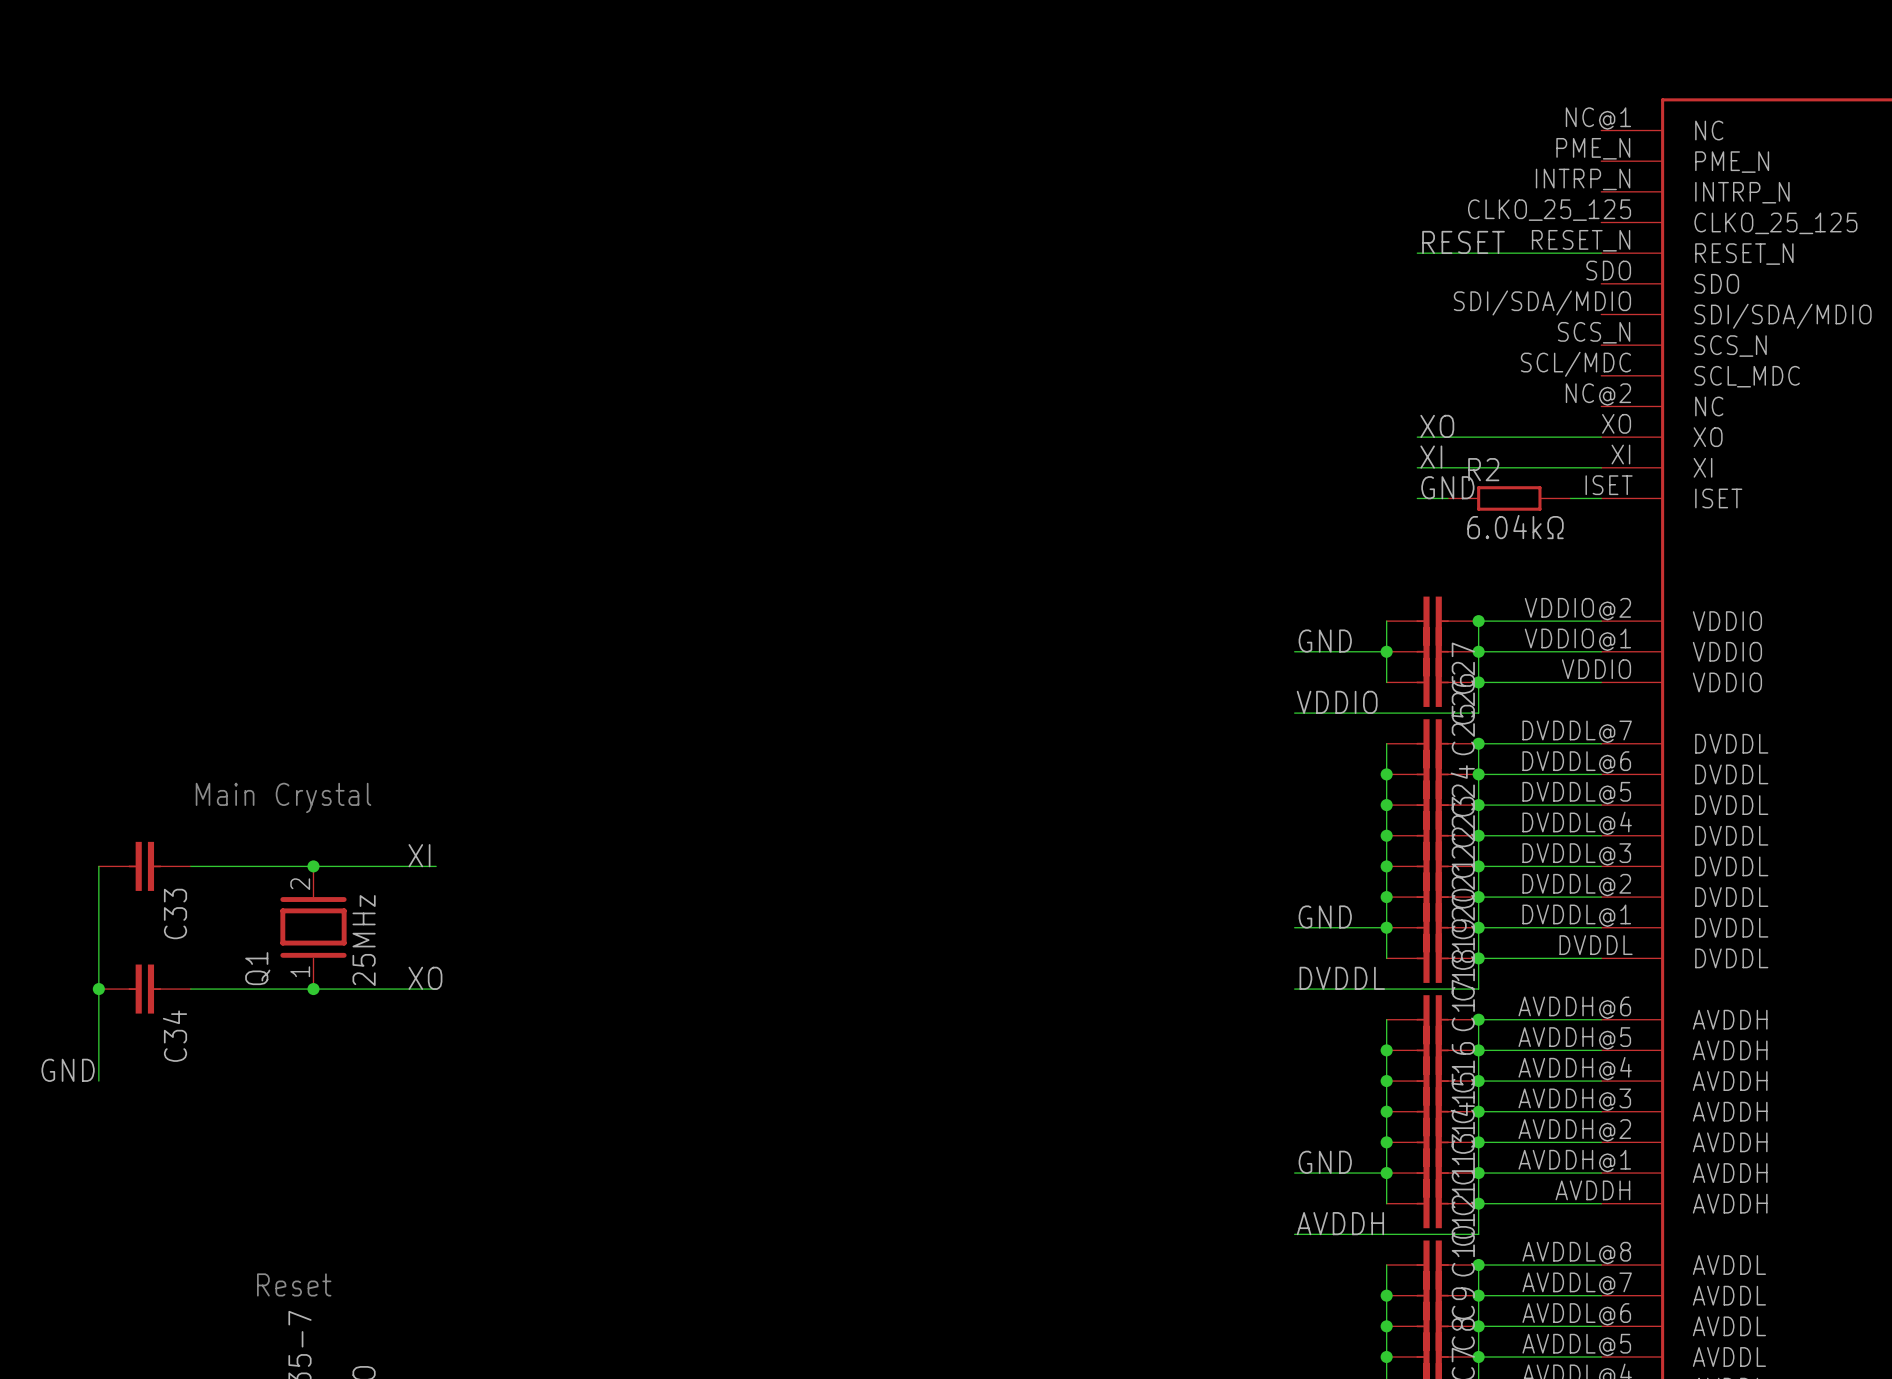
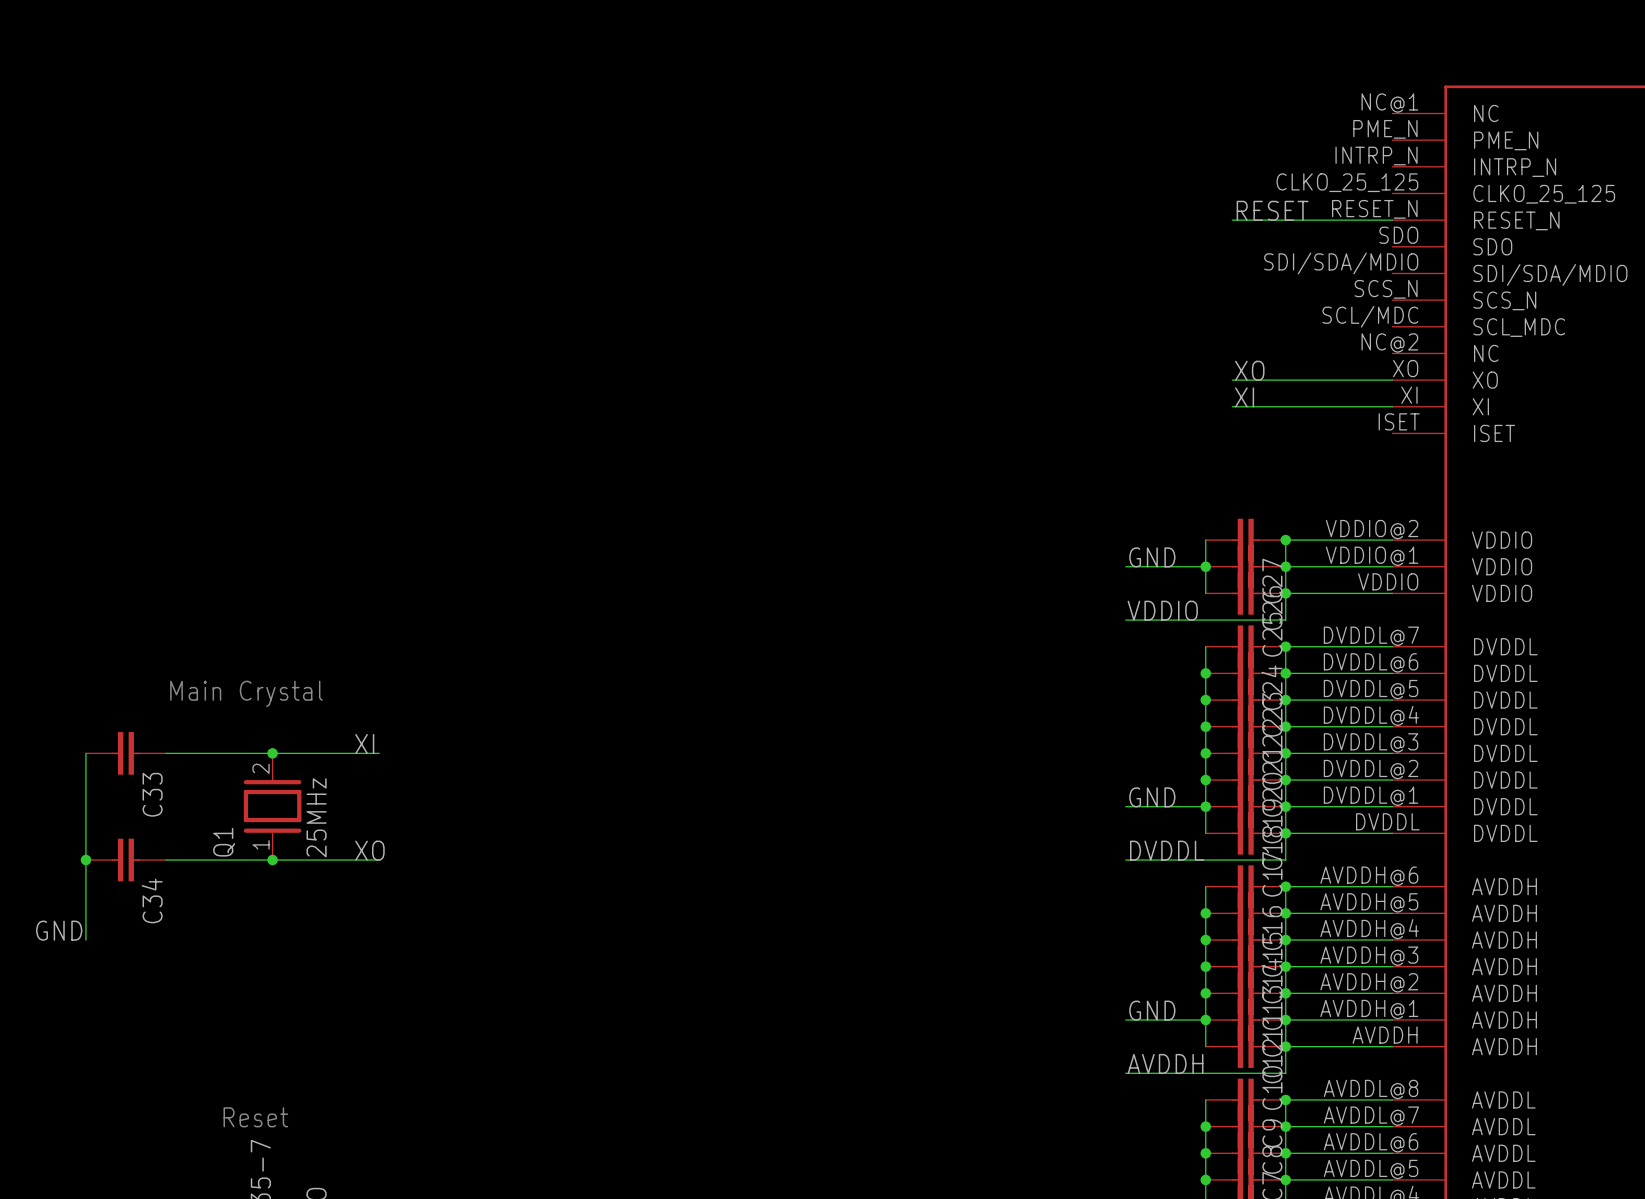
label: GND (1447, 487) -> none
wire: (1417, 498) (1447, 498) -> none
R2: 6.04kΩ (1509, 498) -> none
wire: (1570, 498) (1601, 498) -> none

